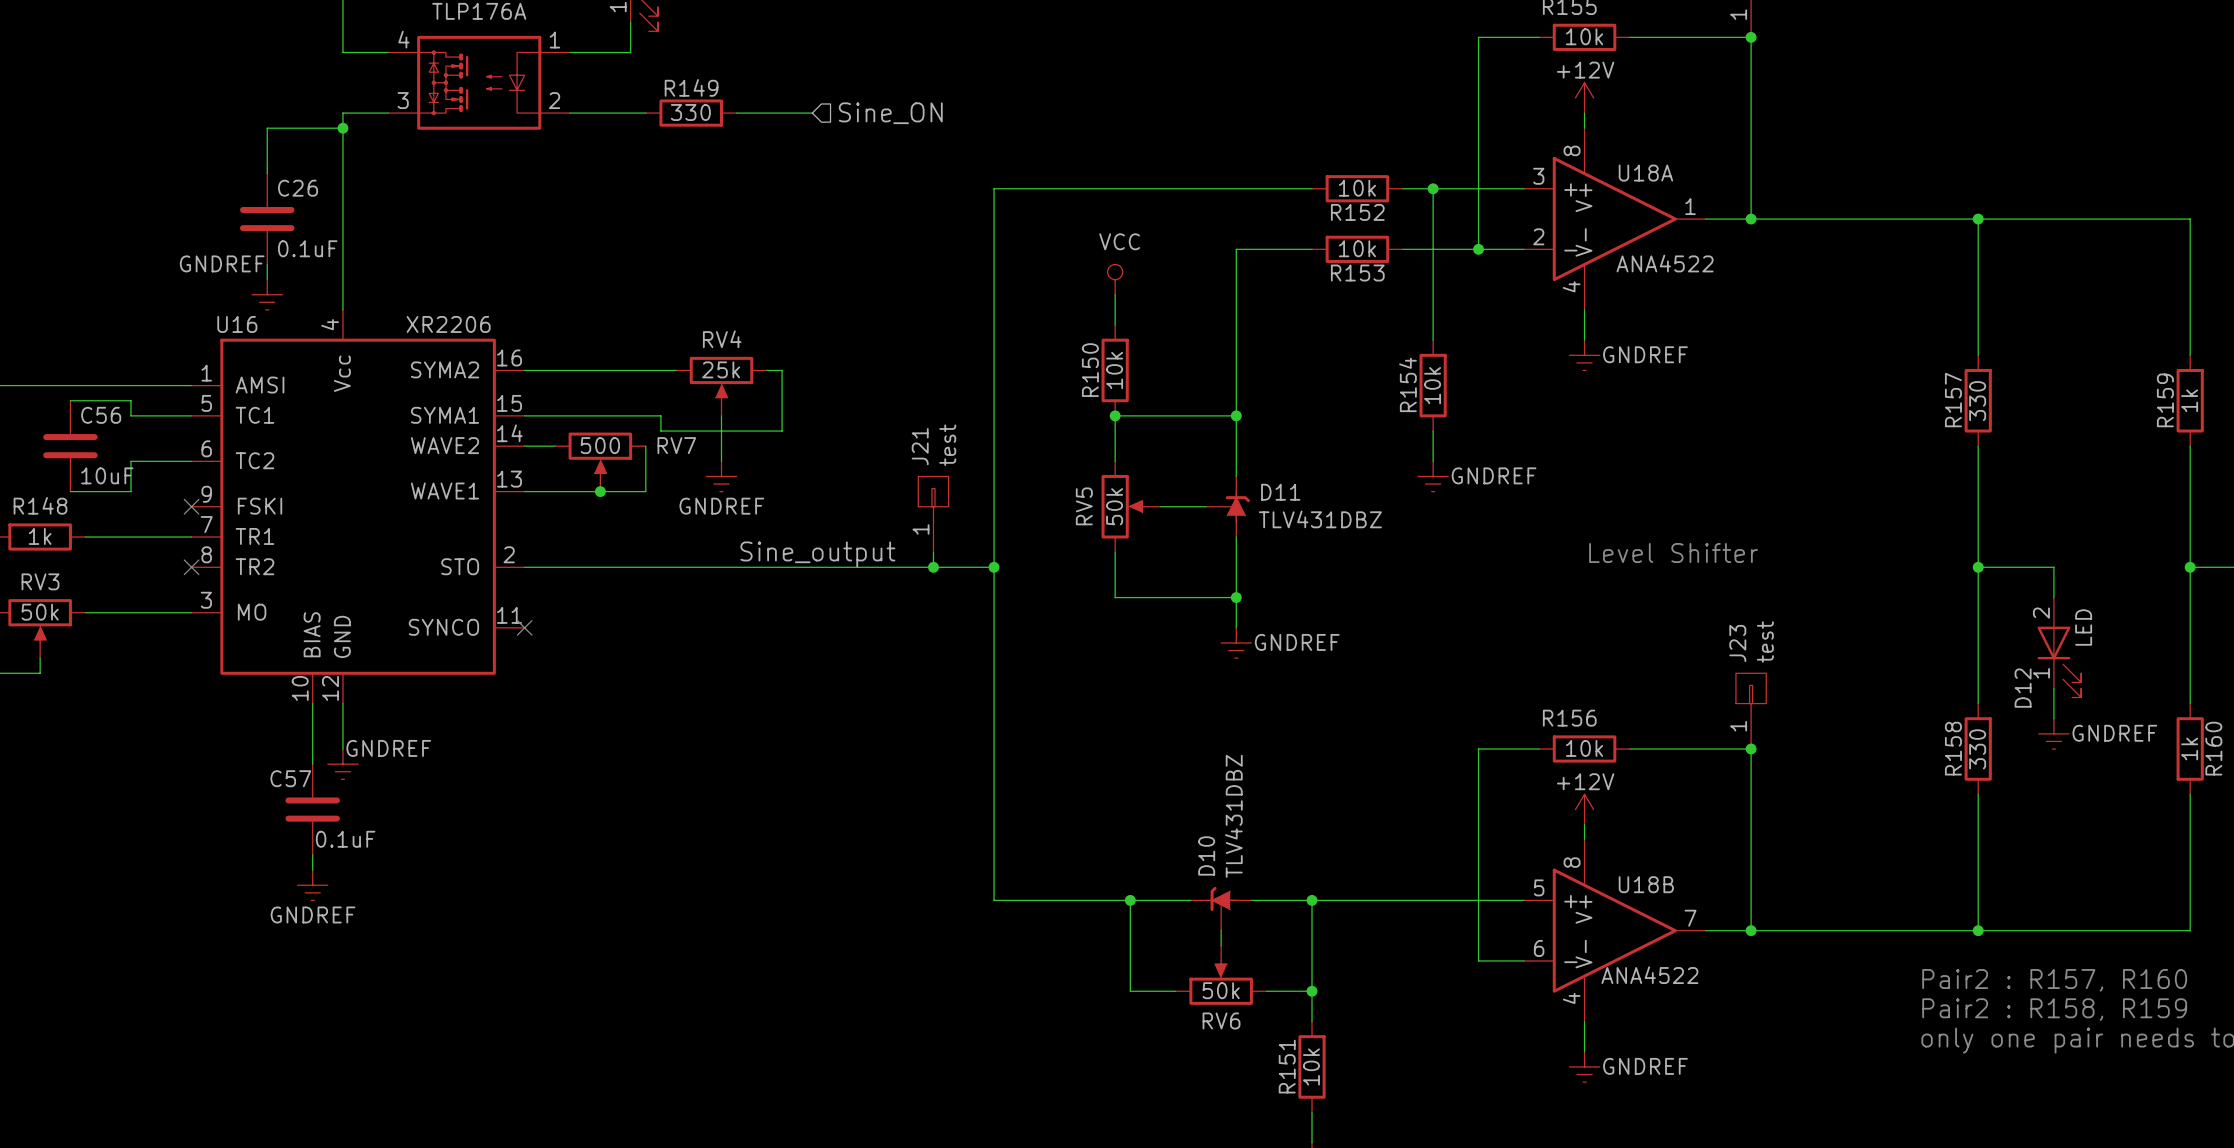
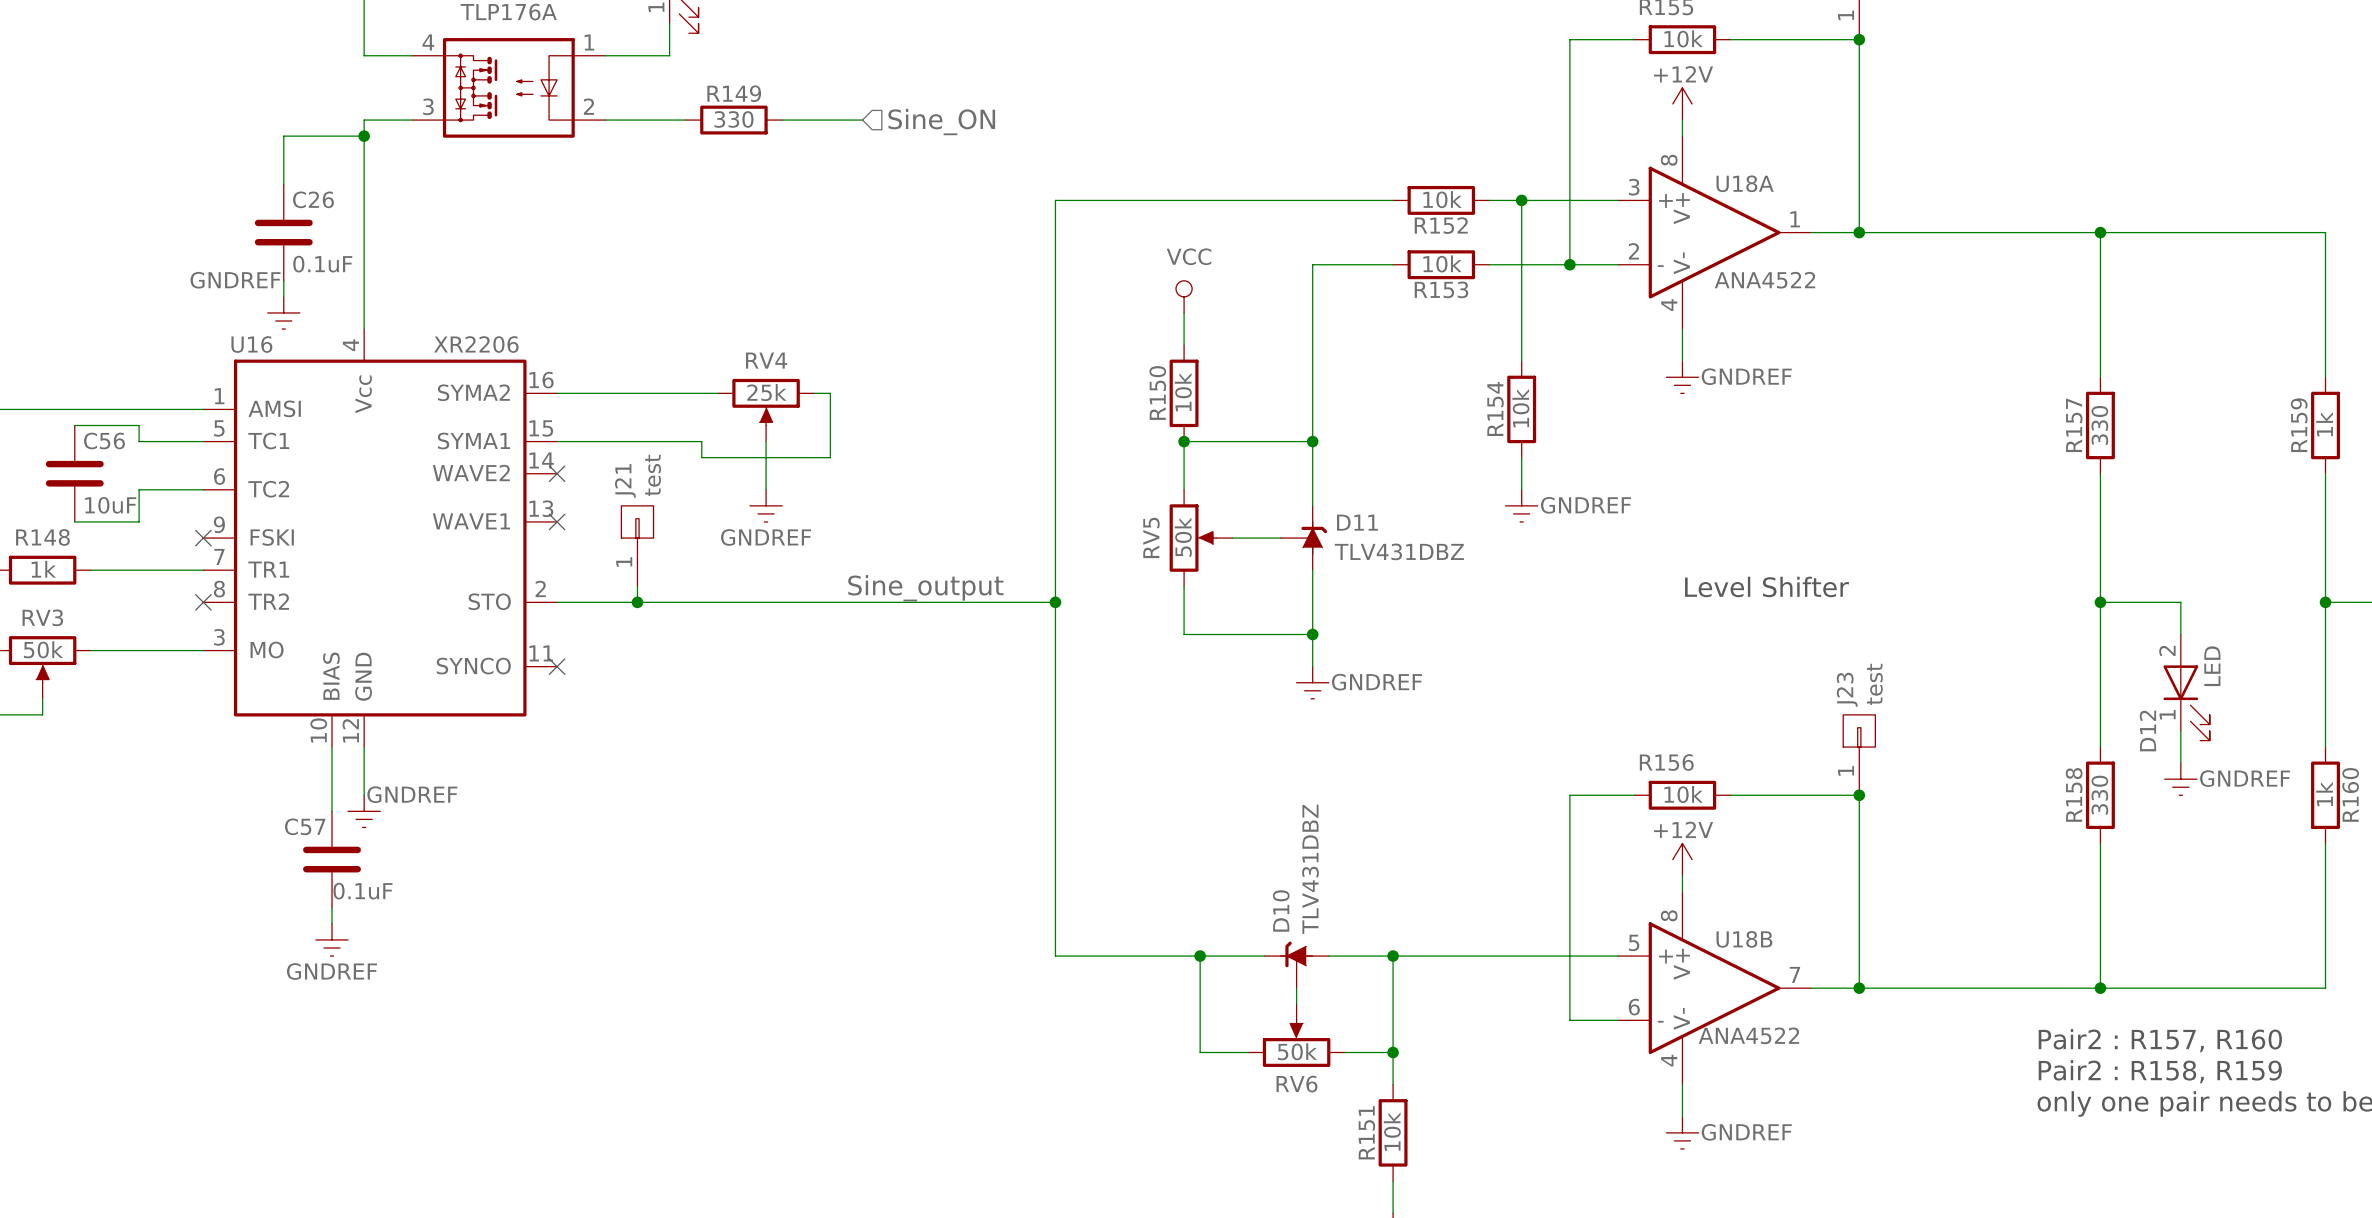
wire: (524, 446) (554, 446) -> none
no-connect mark: none -> (557, 473)
wire: (645, 446) (645, 491) (524, 491) -> none
RV7: 500 (600, 462) -> none
no-connect mark: none -> (557, 521)
junction: (600, 491) -> none
J21 position: (933, 514) -> (637, 546)
wire: none -> (637, 586) (637, 602)
wire: (933, 552) (933, 567) -> none
label position: Sine_output (817, 554) -> Sine_output (925, 588)
junction: none -> (637, 602)
junction: (933, 567) -> none

